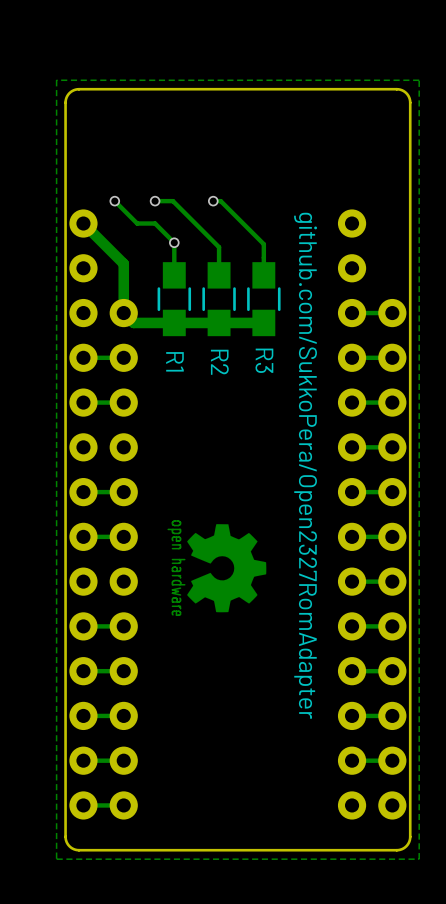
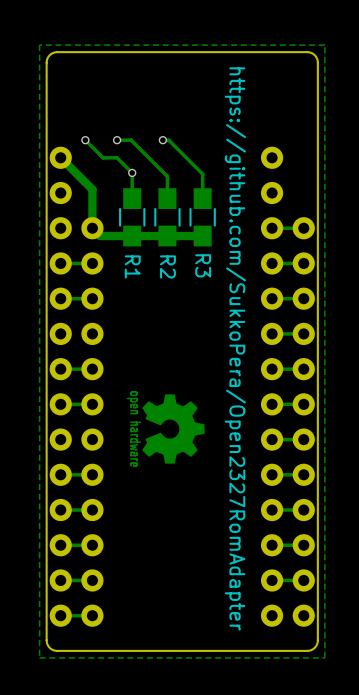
text: github.com/SukkoPera/Open2327RomAdapter (305, 465) -> https://github.com/SukkoPera/Open2327RomAdapter (235, 348)

